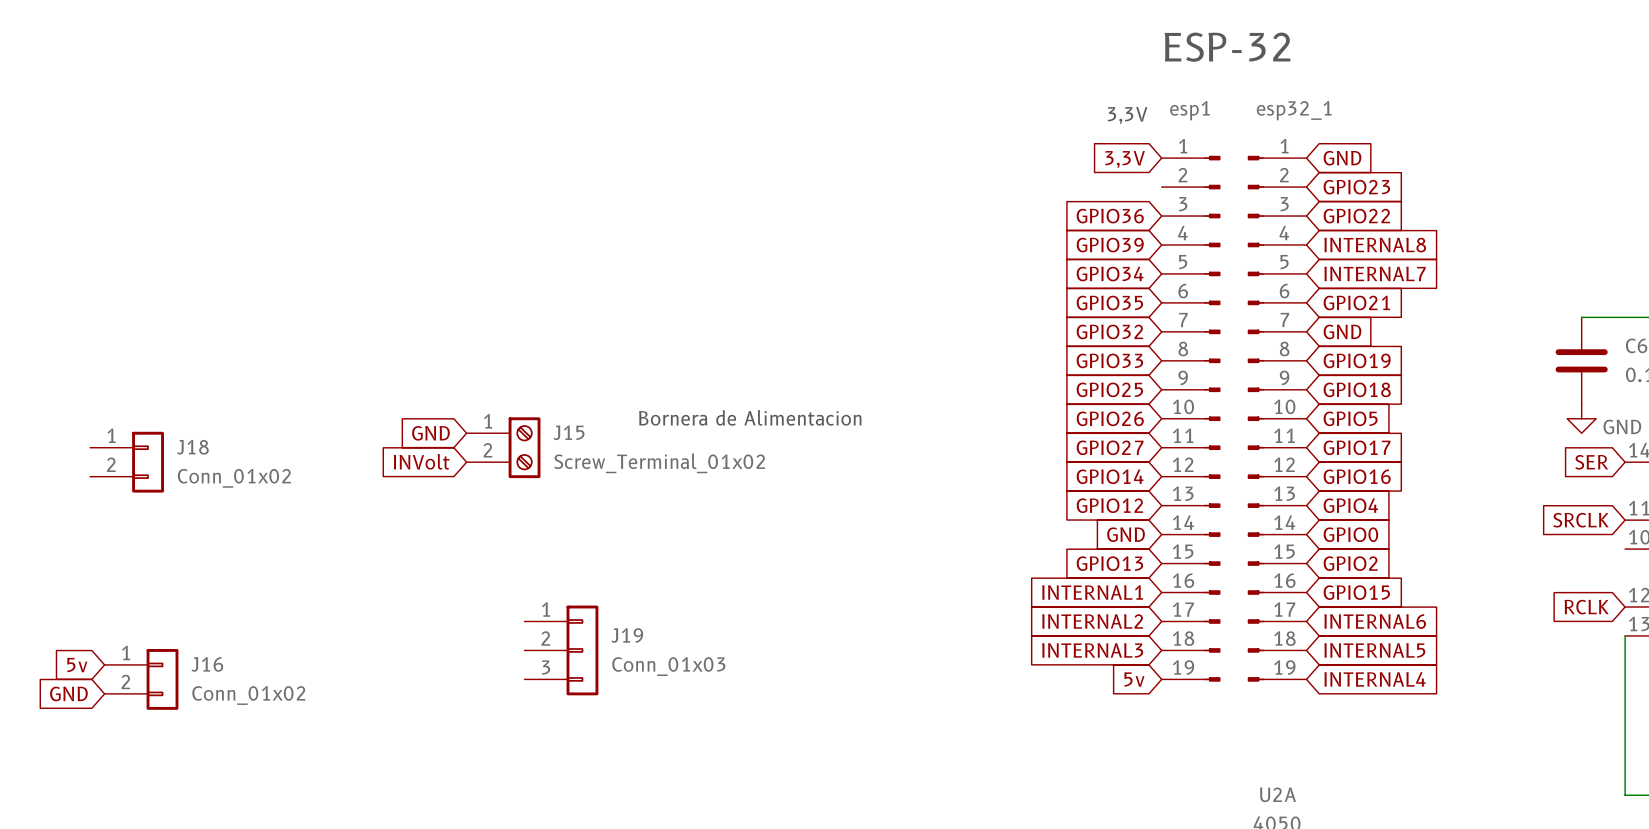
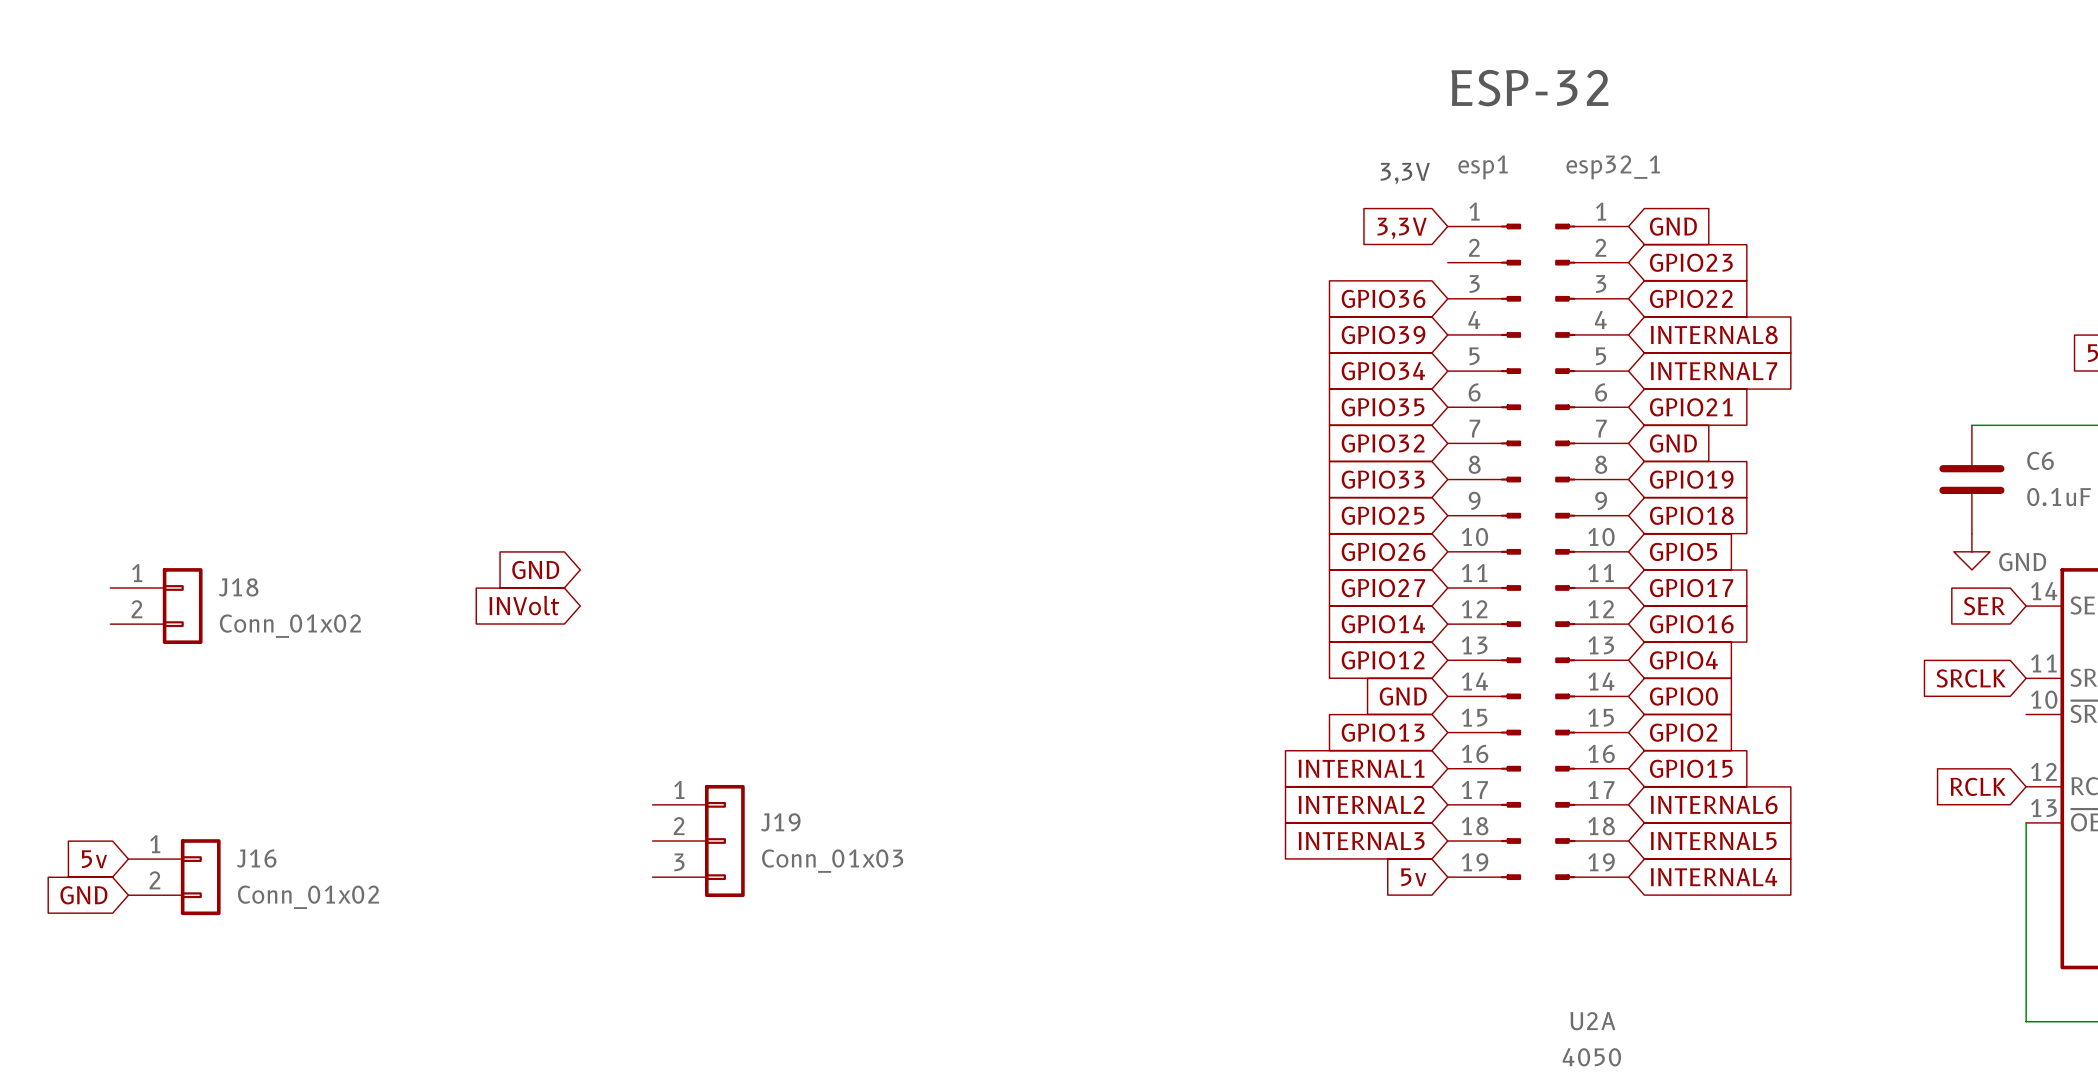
text: Bornera de Alimentacion (750, 417) -> none
J15: Screw_Terminal_01x02 (503, 447) -> none

